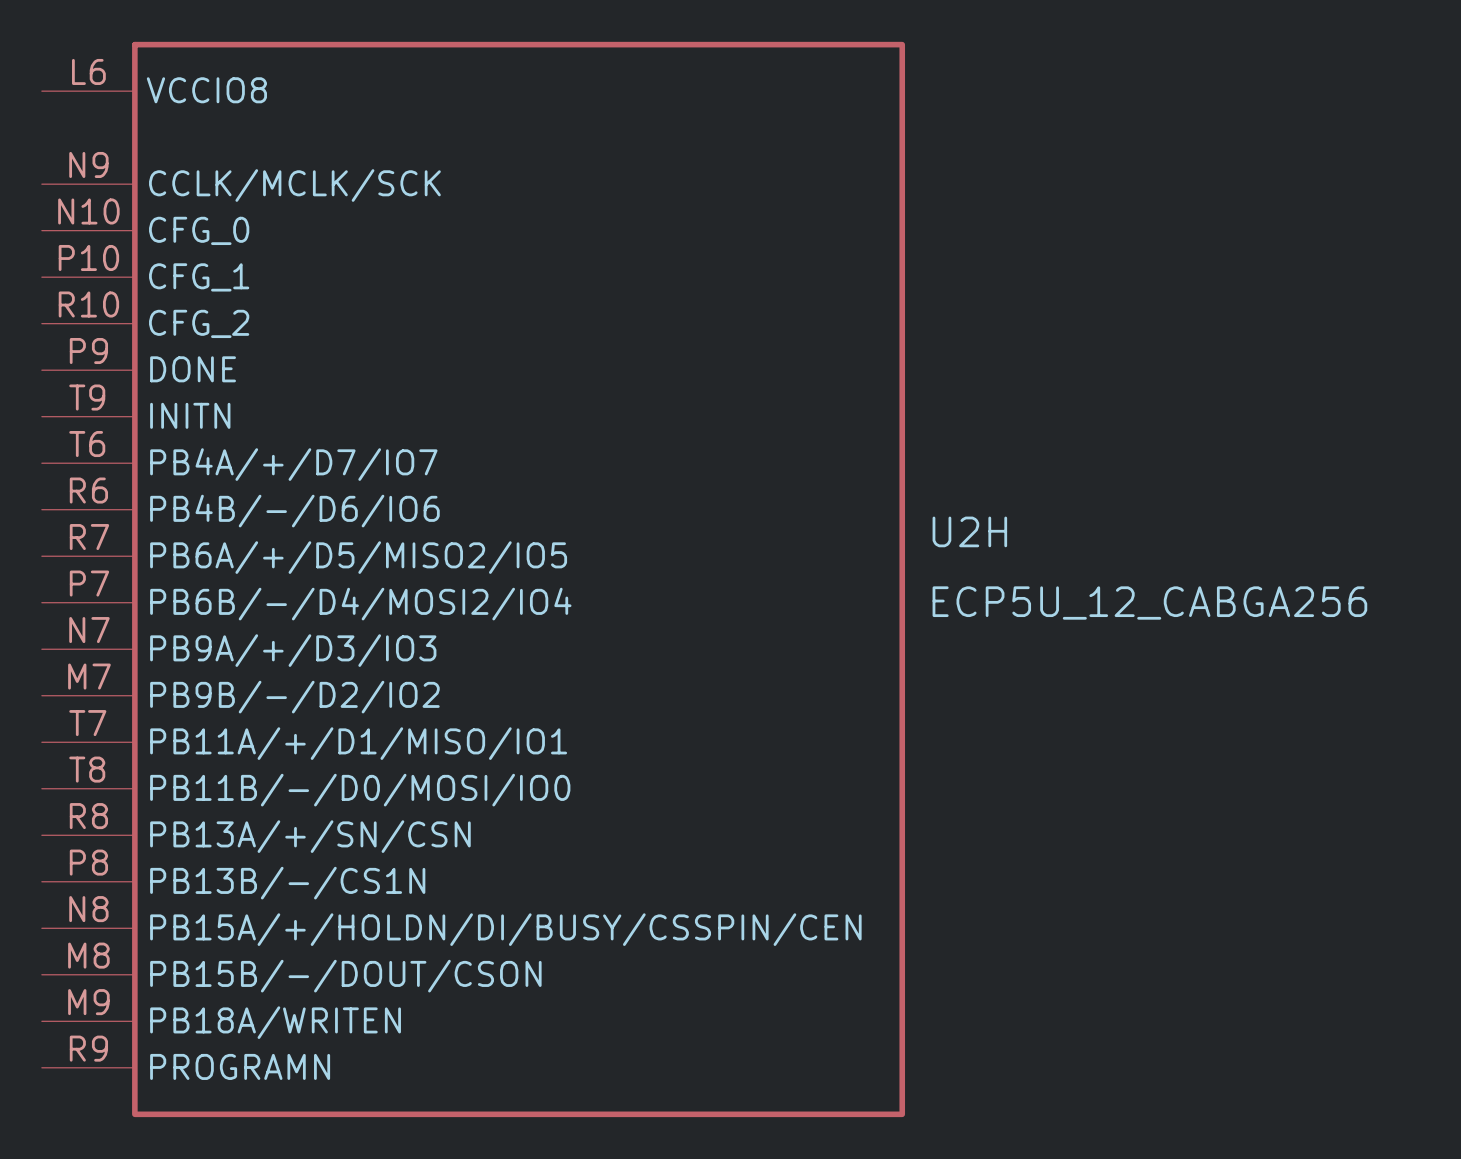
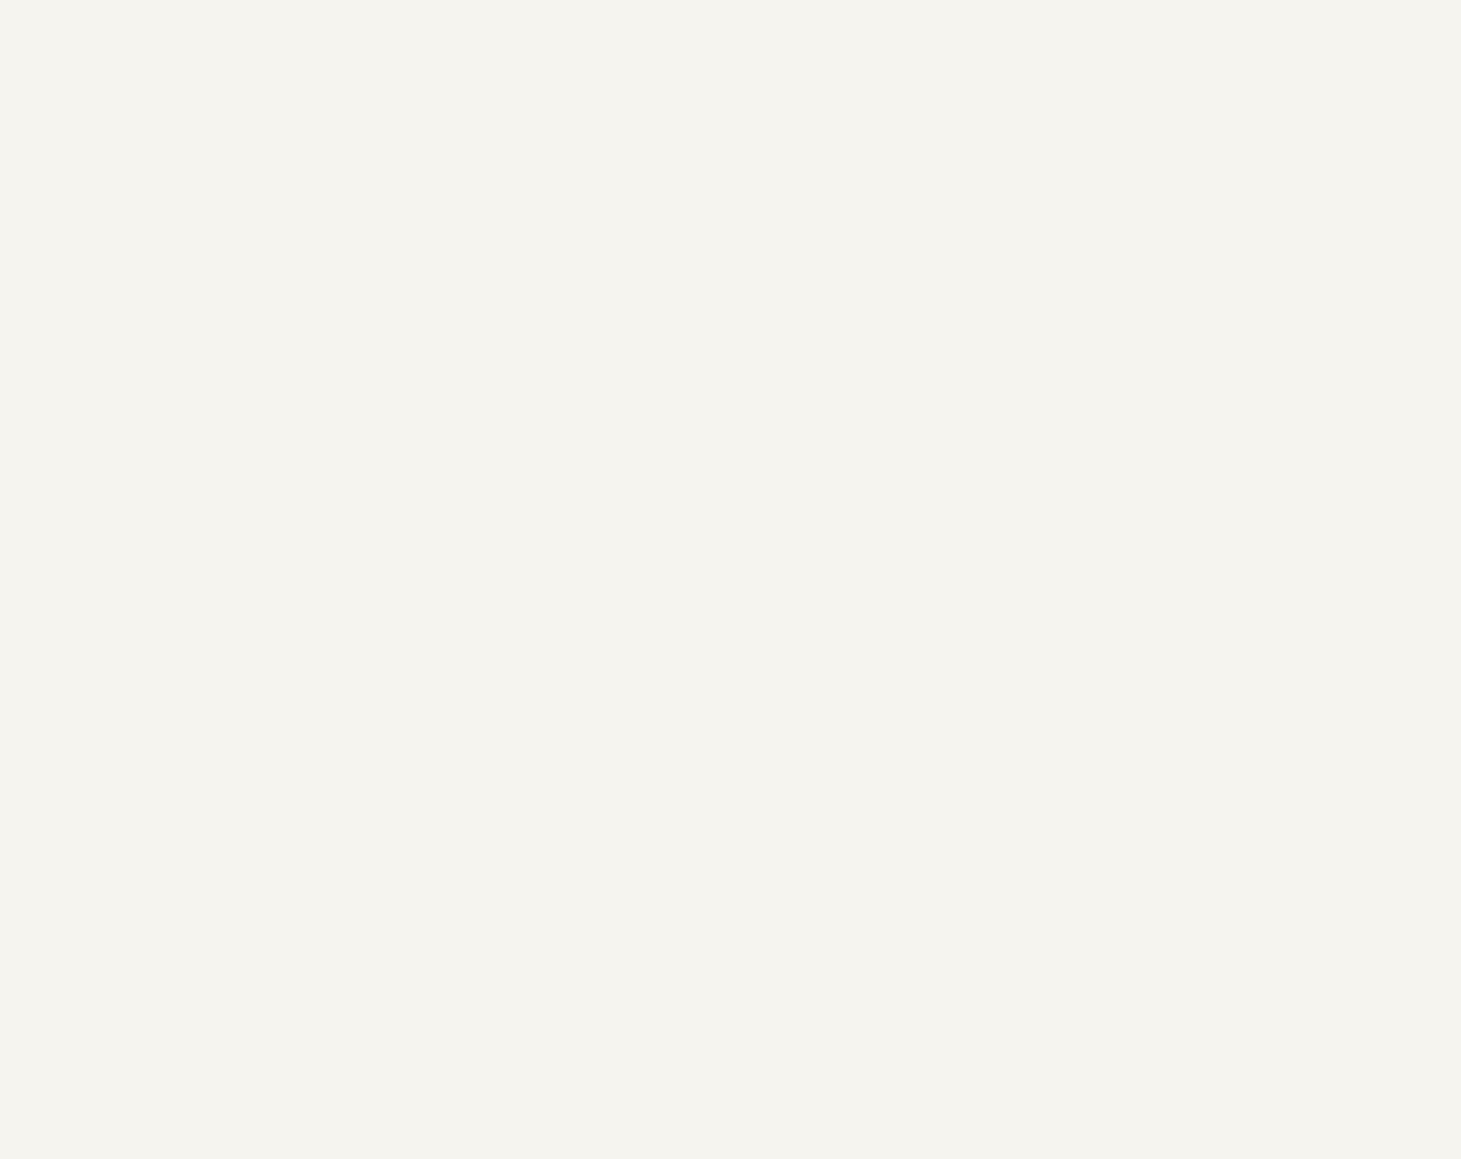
U2H: ECP5U_12_CABGA256 (473, 579) -> none

